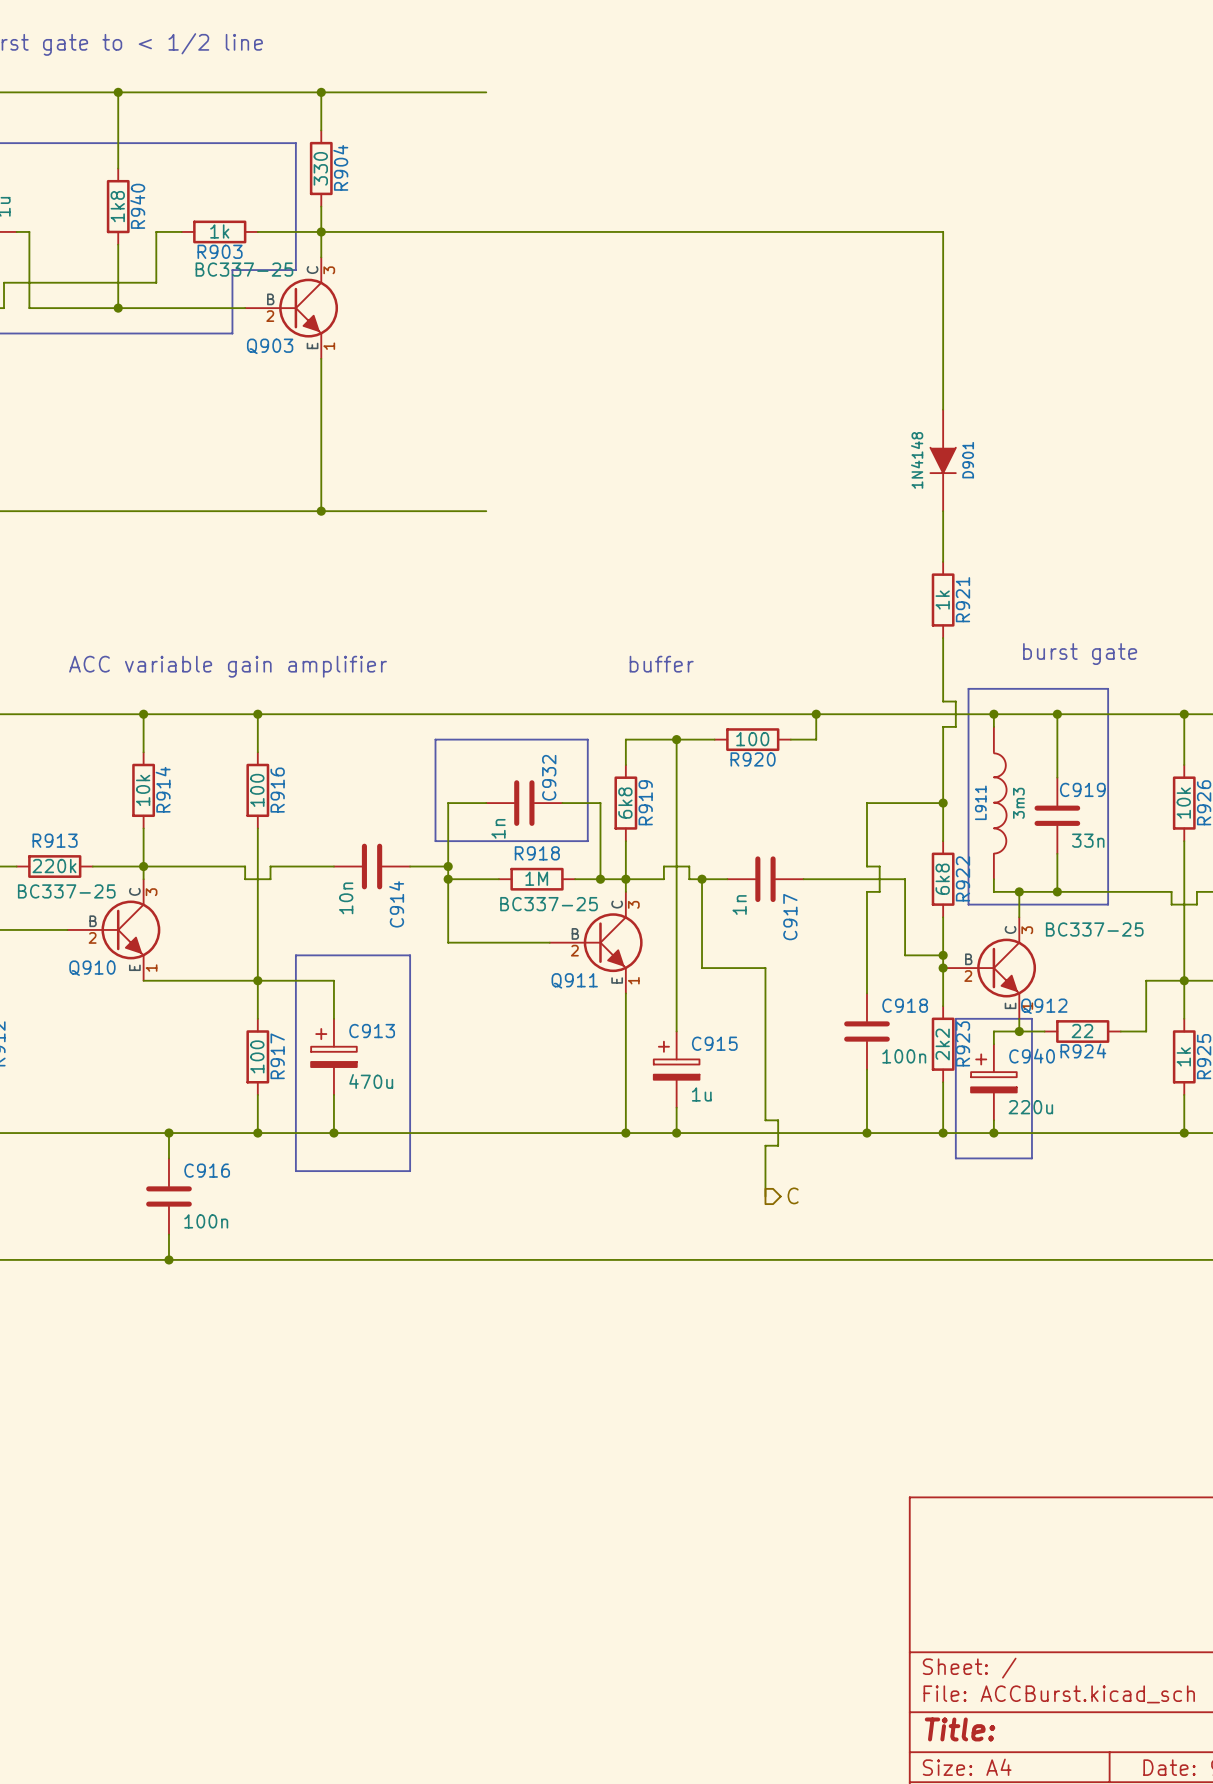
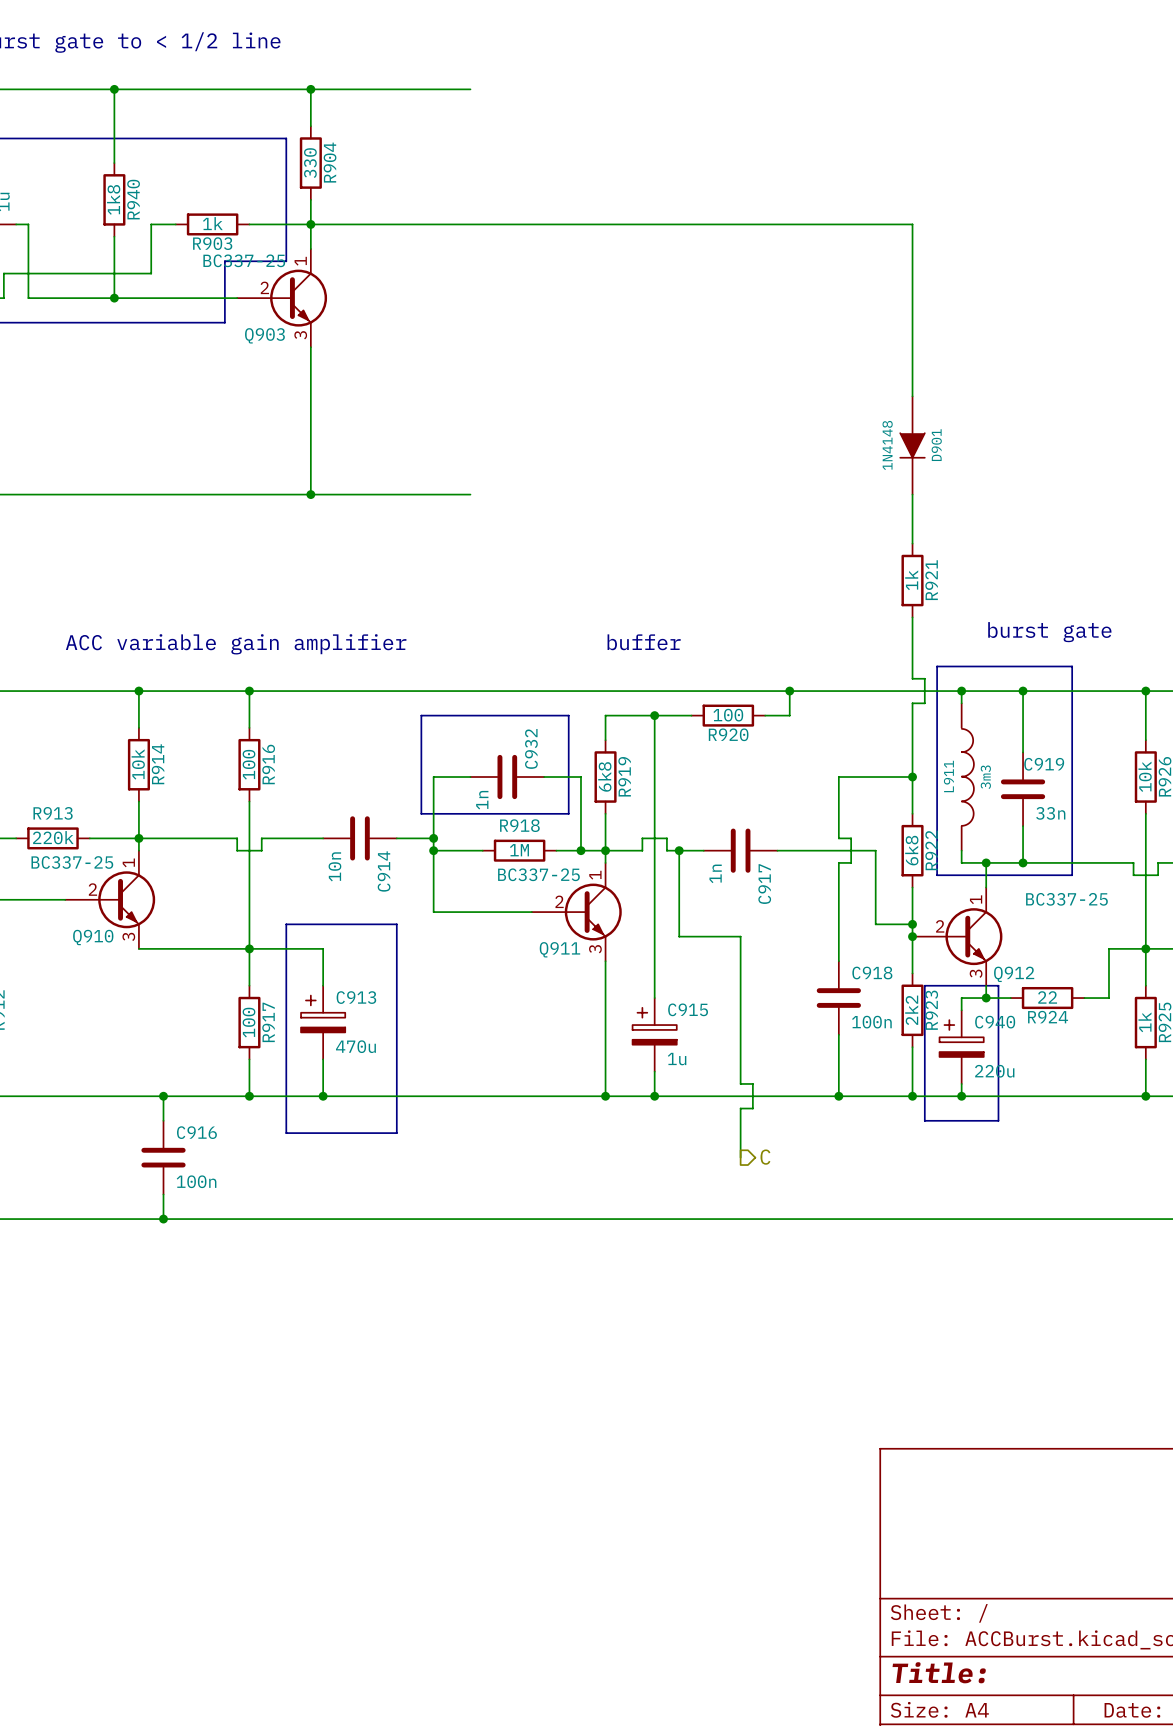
Q903 symbol: [245, 257, 339, 359] -> [237, 249, 328, 348]
Q910 symbol: [67, 879, 161, 981] -> [65, 850, 156, 949]
Q911 symbol: [549, 891, 643, 994] -> [531, 862, 622, 962]
Q912 symbol: [943, 917, 1037, 1019] -> [912, 887, 1003, 986]

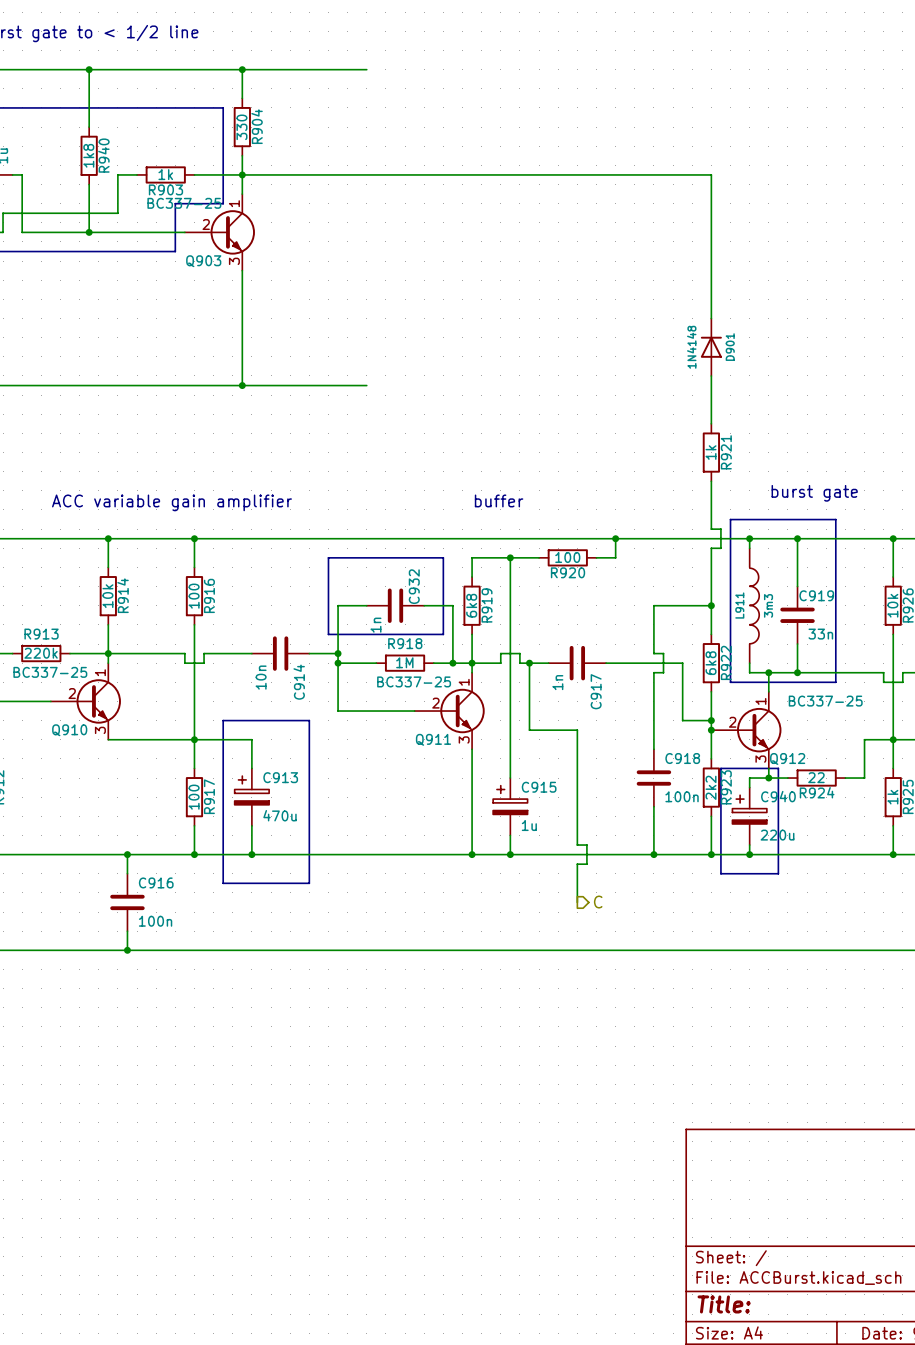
D901 symbol: [899, 396, 926, 495] -> [700, 318, 722, 376]

